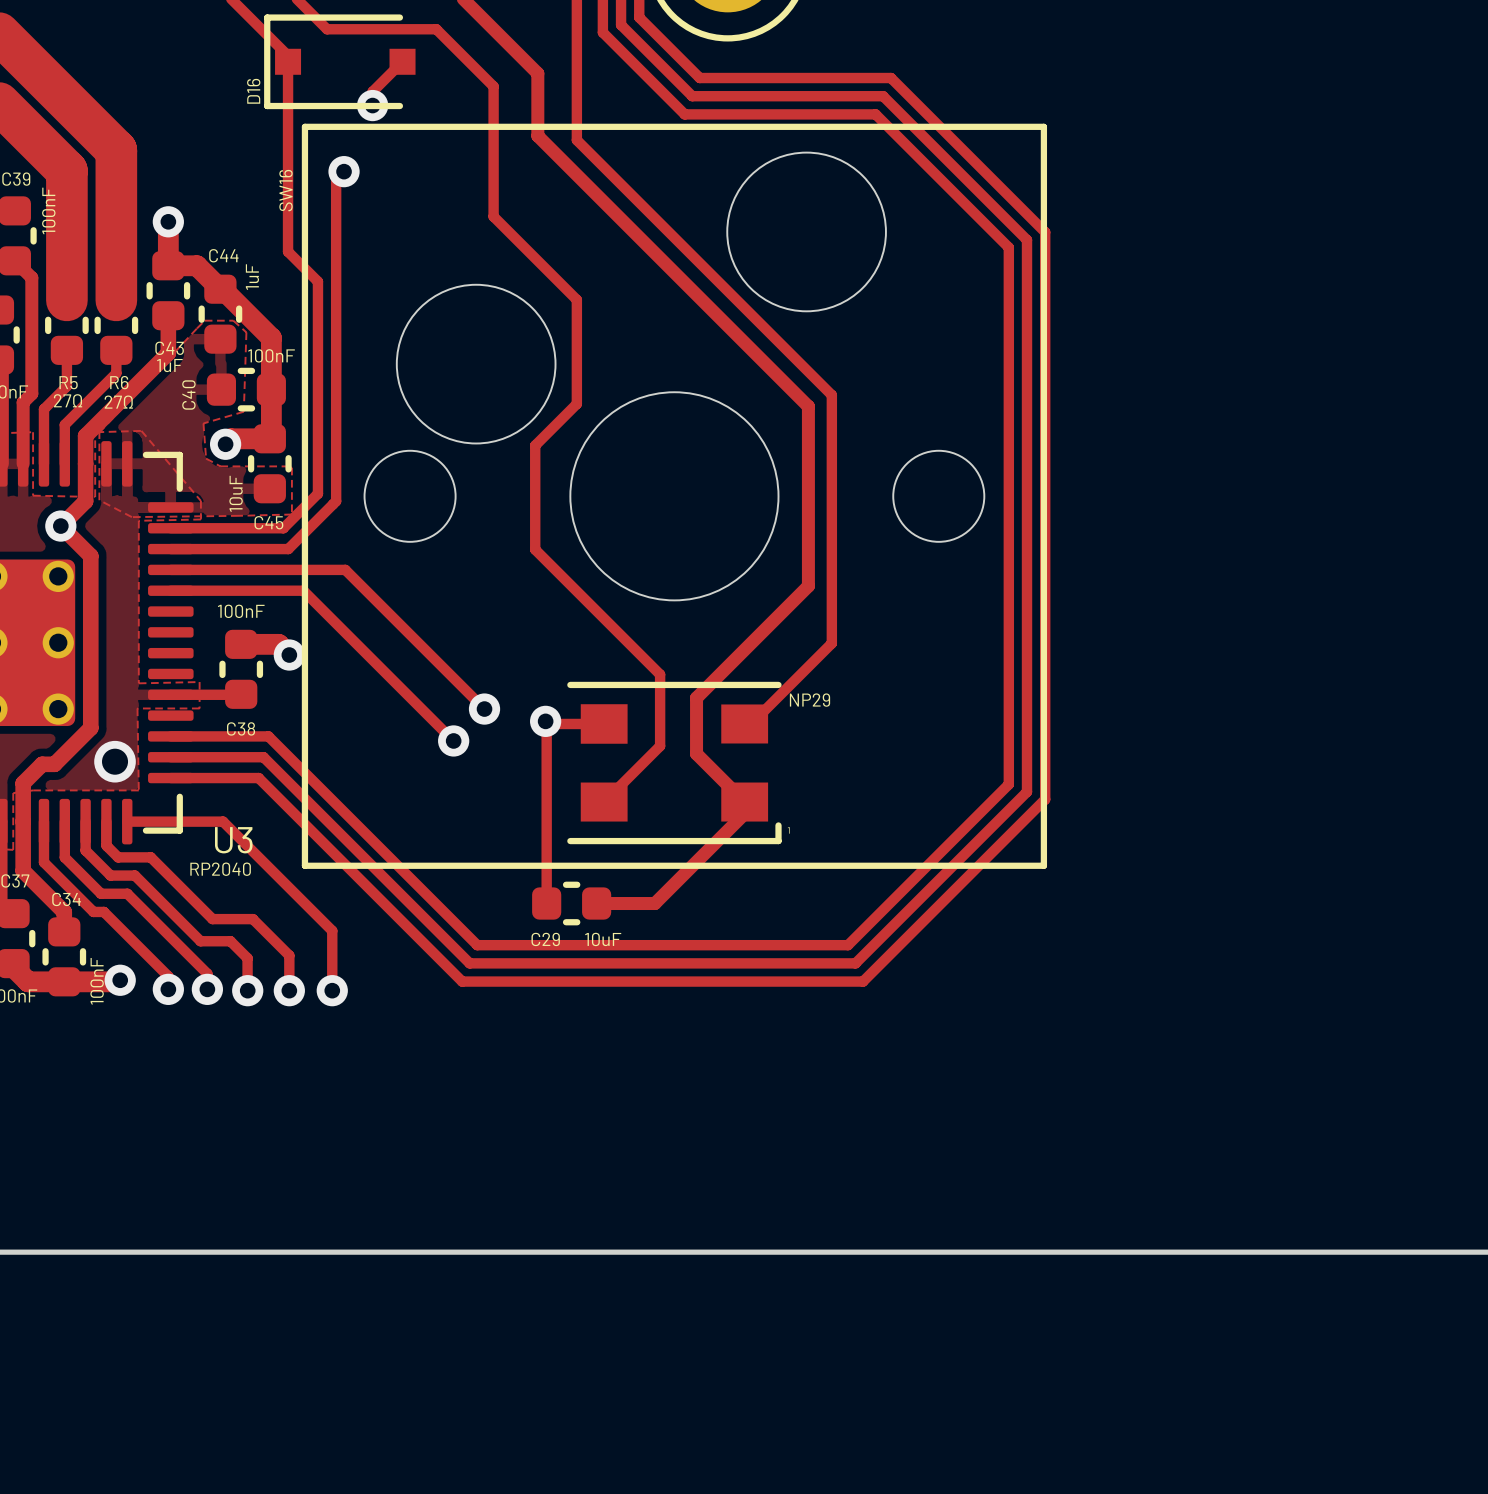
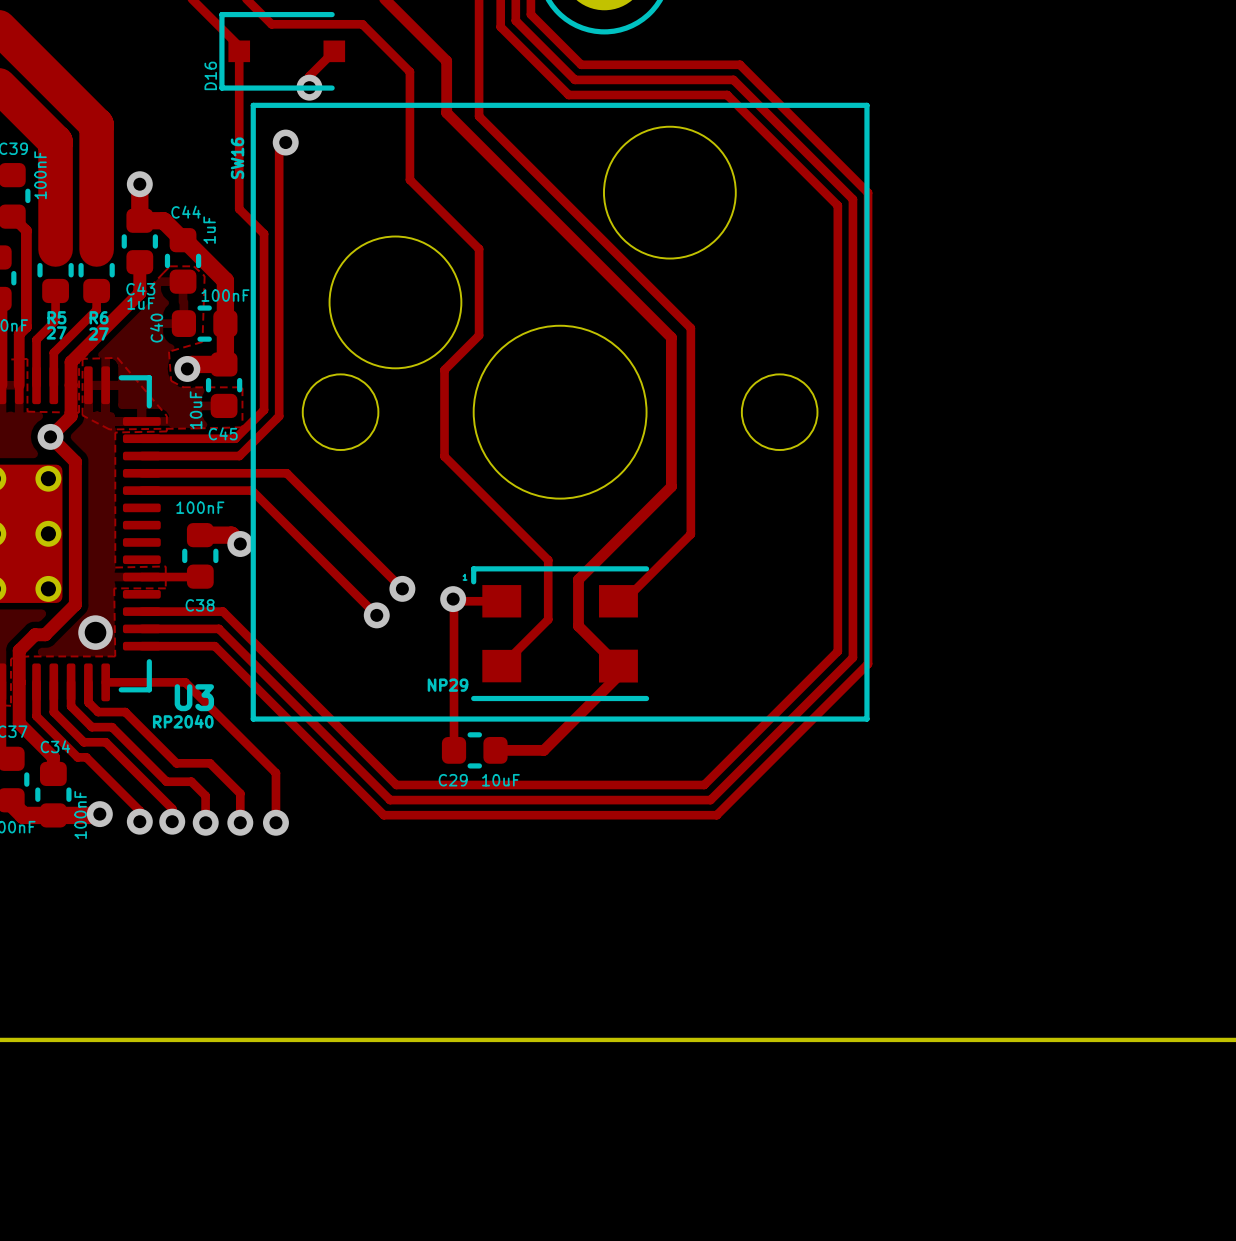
R5 value: 27Ω (68, 400) -> 27 (56, 332)
R6 value: 27Ω (118, 402) -> 27 (98, 333)
NP29 rotation: 0° (674, 763) -> 180° (560, 633)

